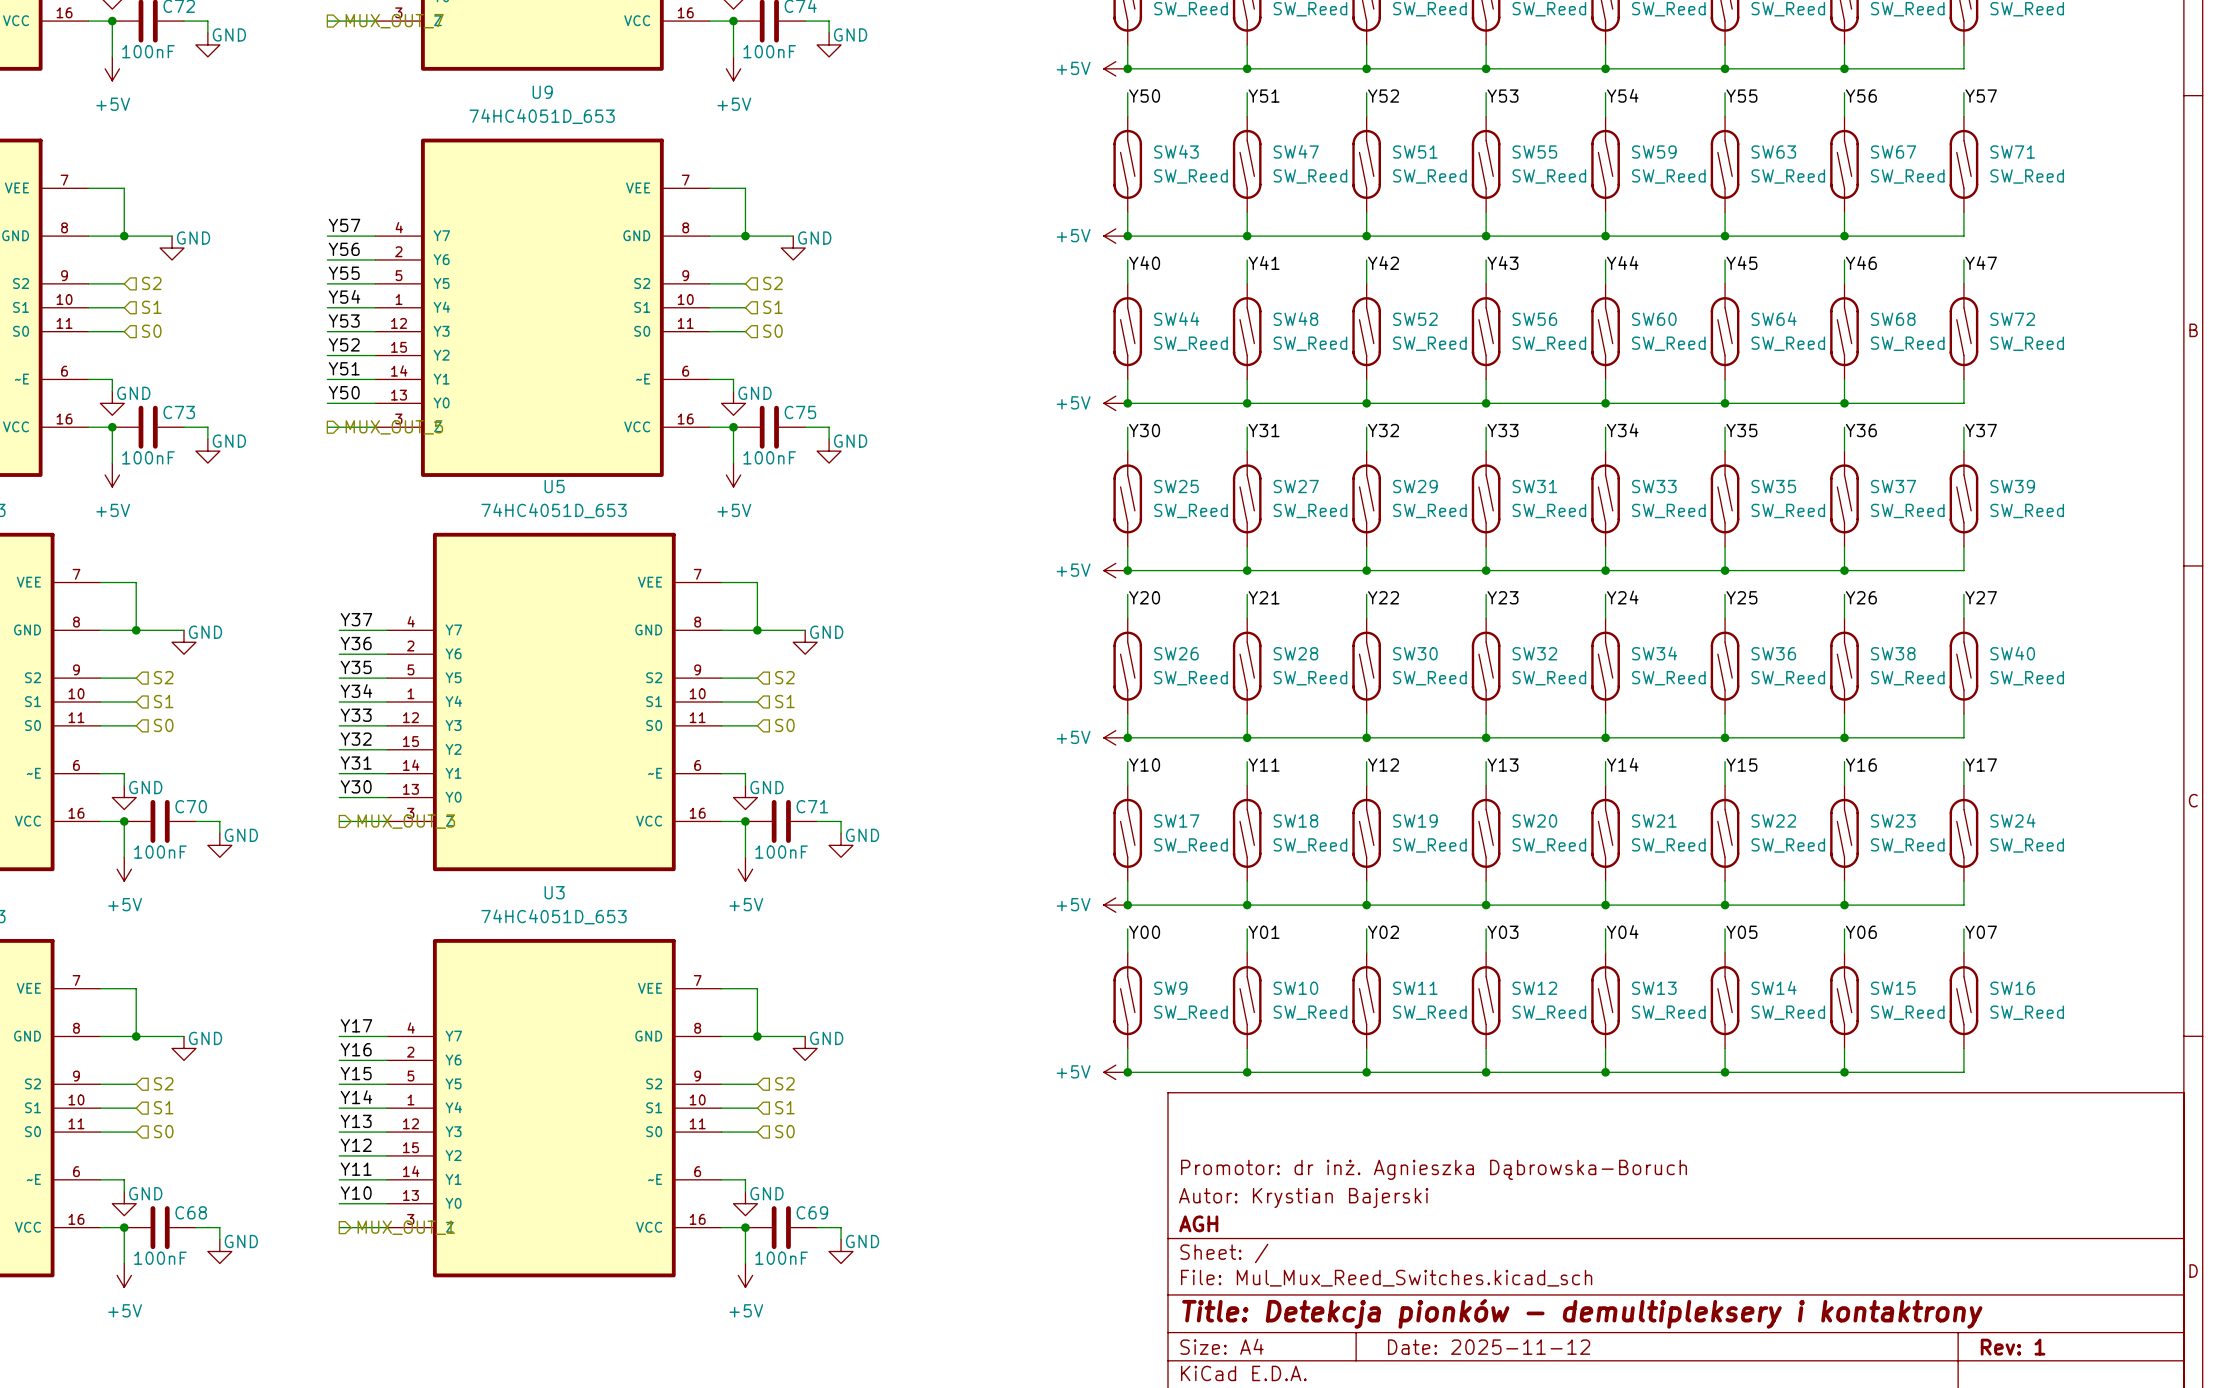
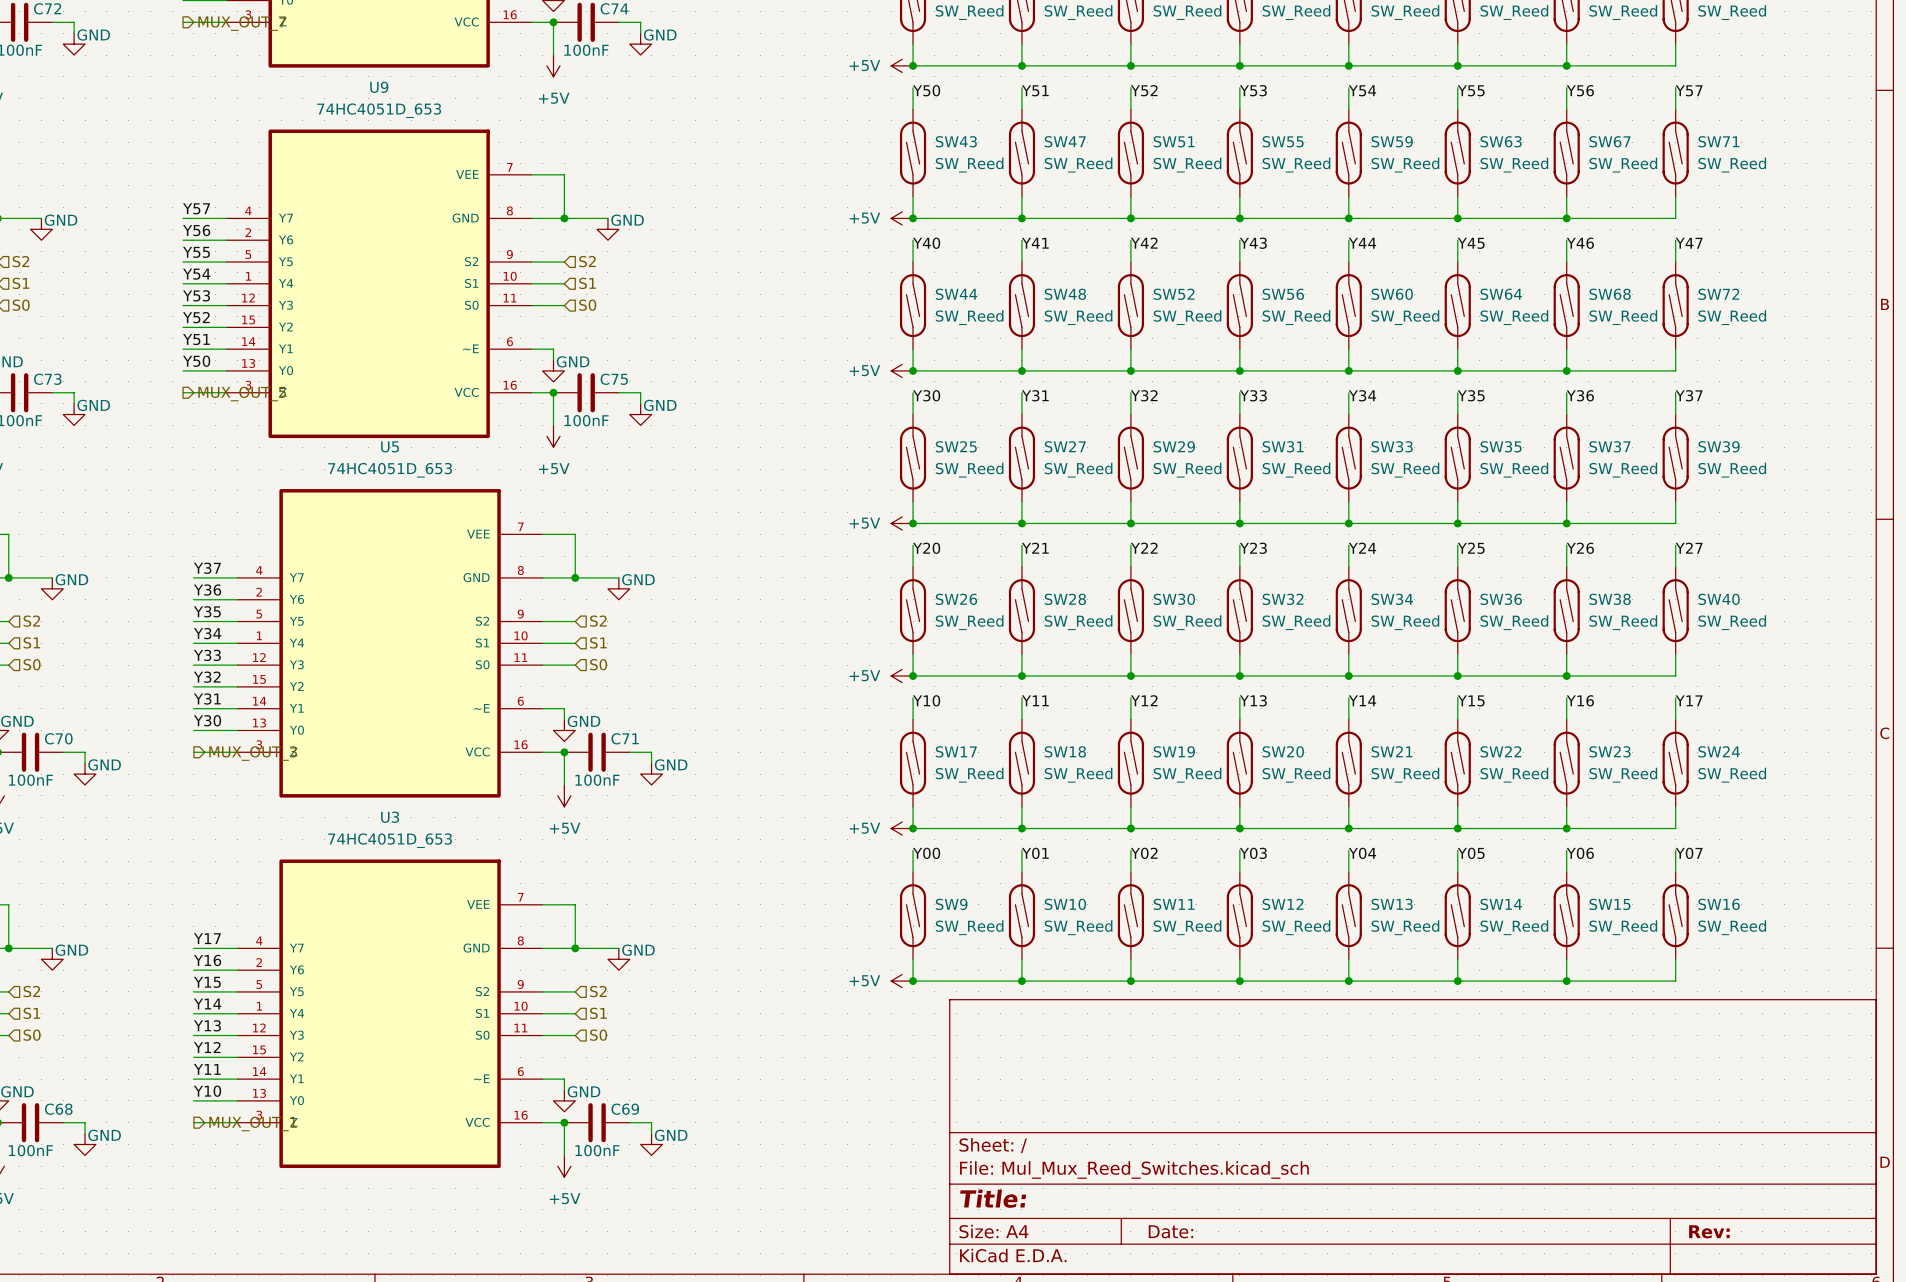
title block: Promotor: dr inż. Agnieszka Dąbrowska-Boruch (1434, 1169) -> none
title block: Autor: Krystian Bajerski (1303, 1198) -> none
title block: AGH (1198, 1223) -> none
title block: Title: Detekcja pionków - demultipleksery i kontaktrony (1582, 1313) -> Title: (993, 1198)
title block: Date: 2025-11-12 (1489, 1347) -> Date: (1170, 1231)
title block: Rev: 1 (2013, 1347) -> Rev: (1709, 1231)

